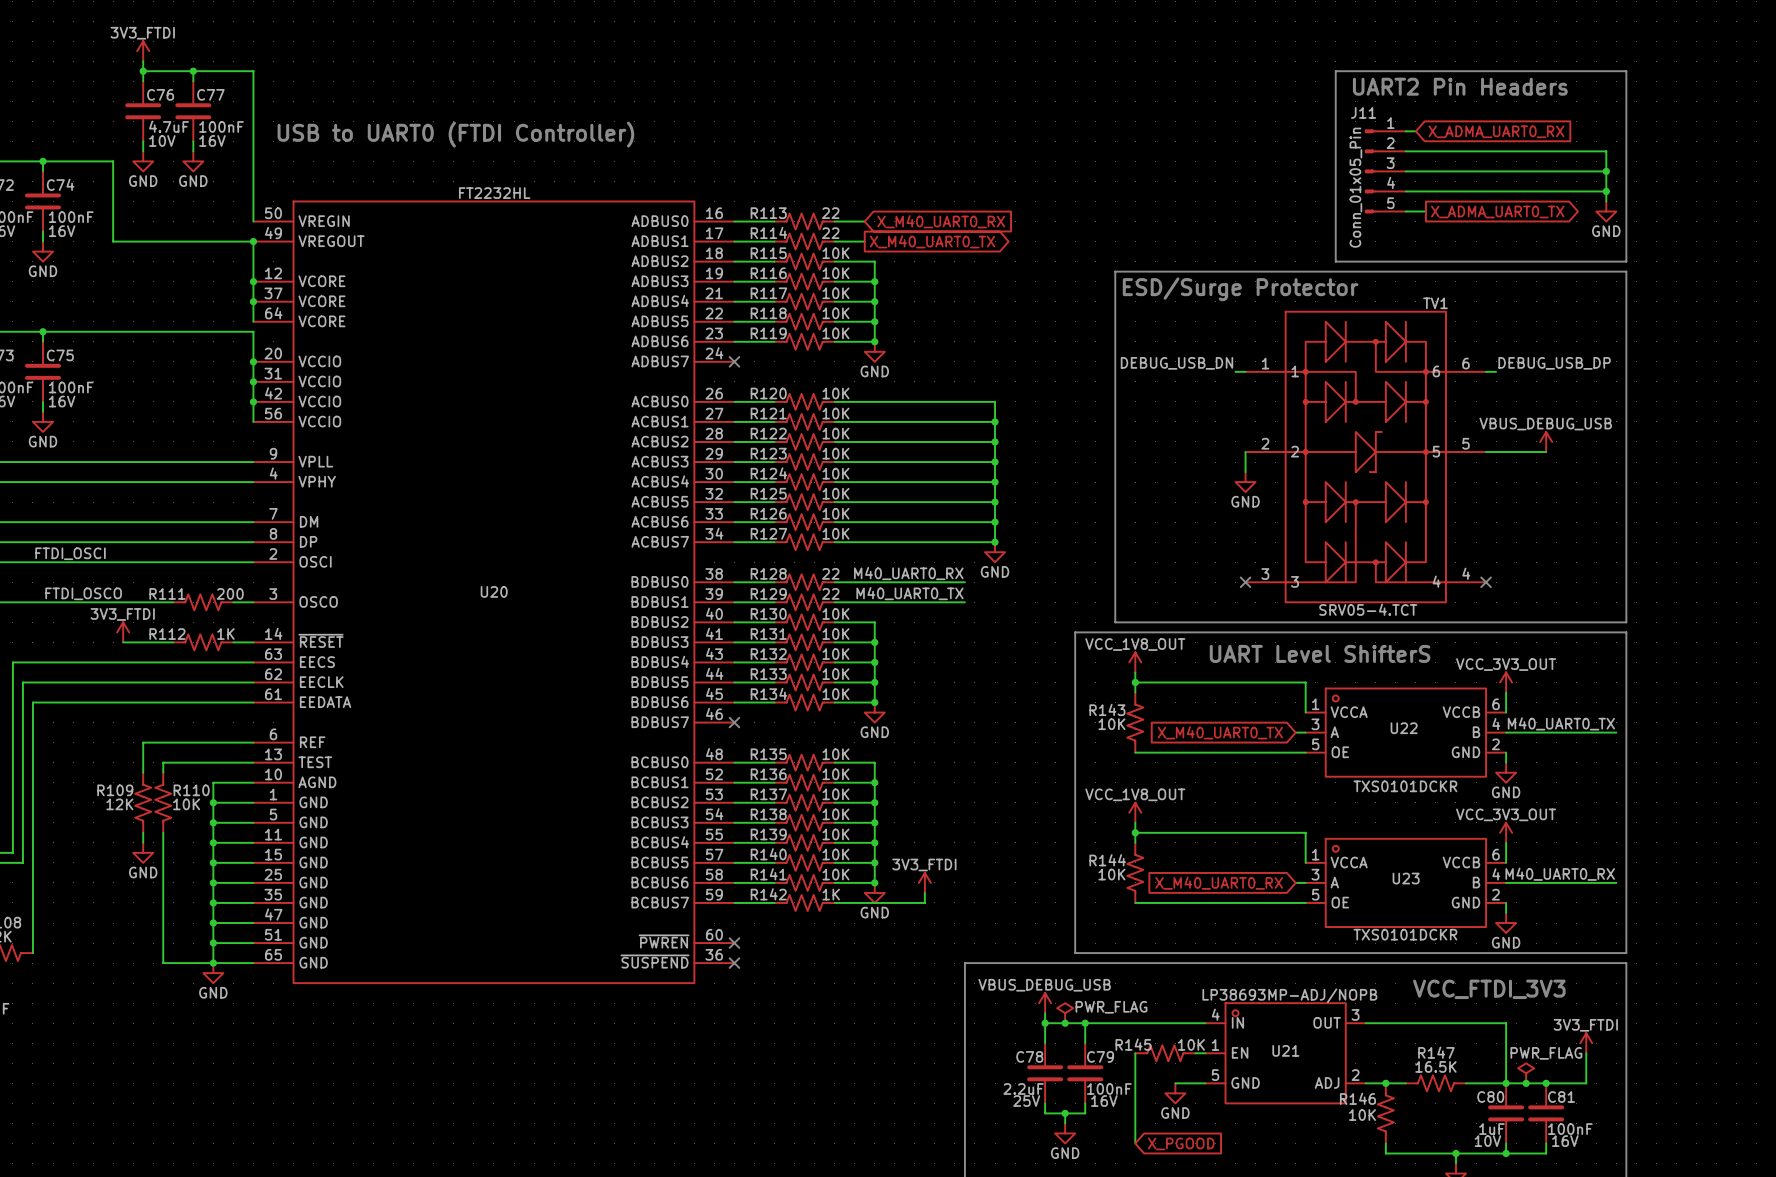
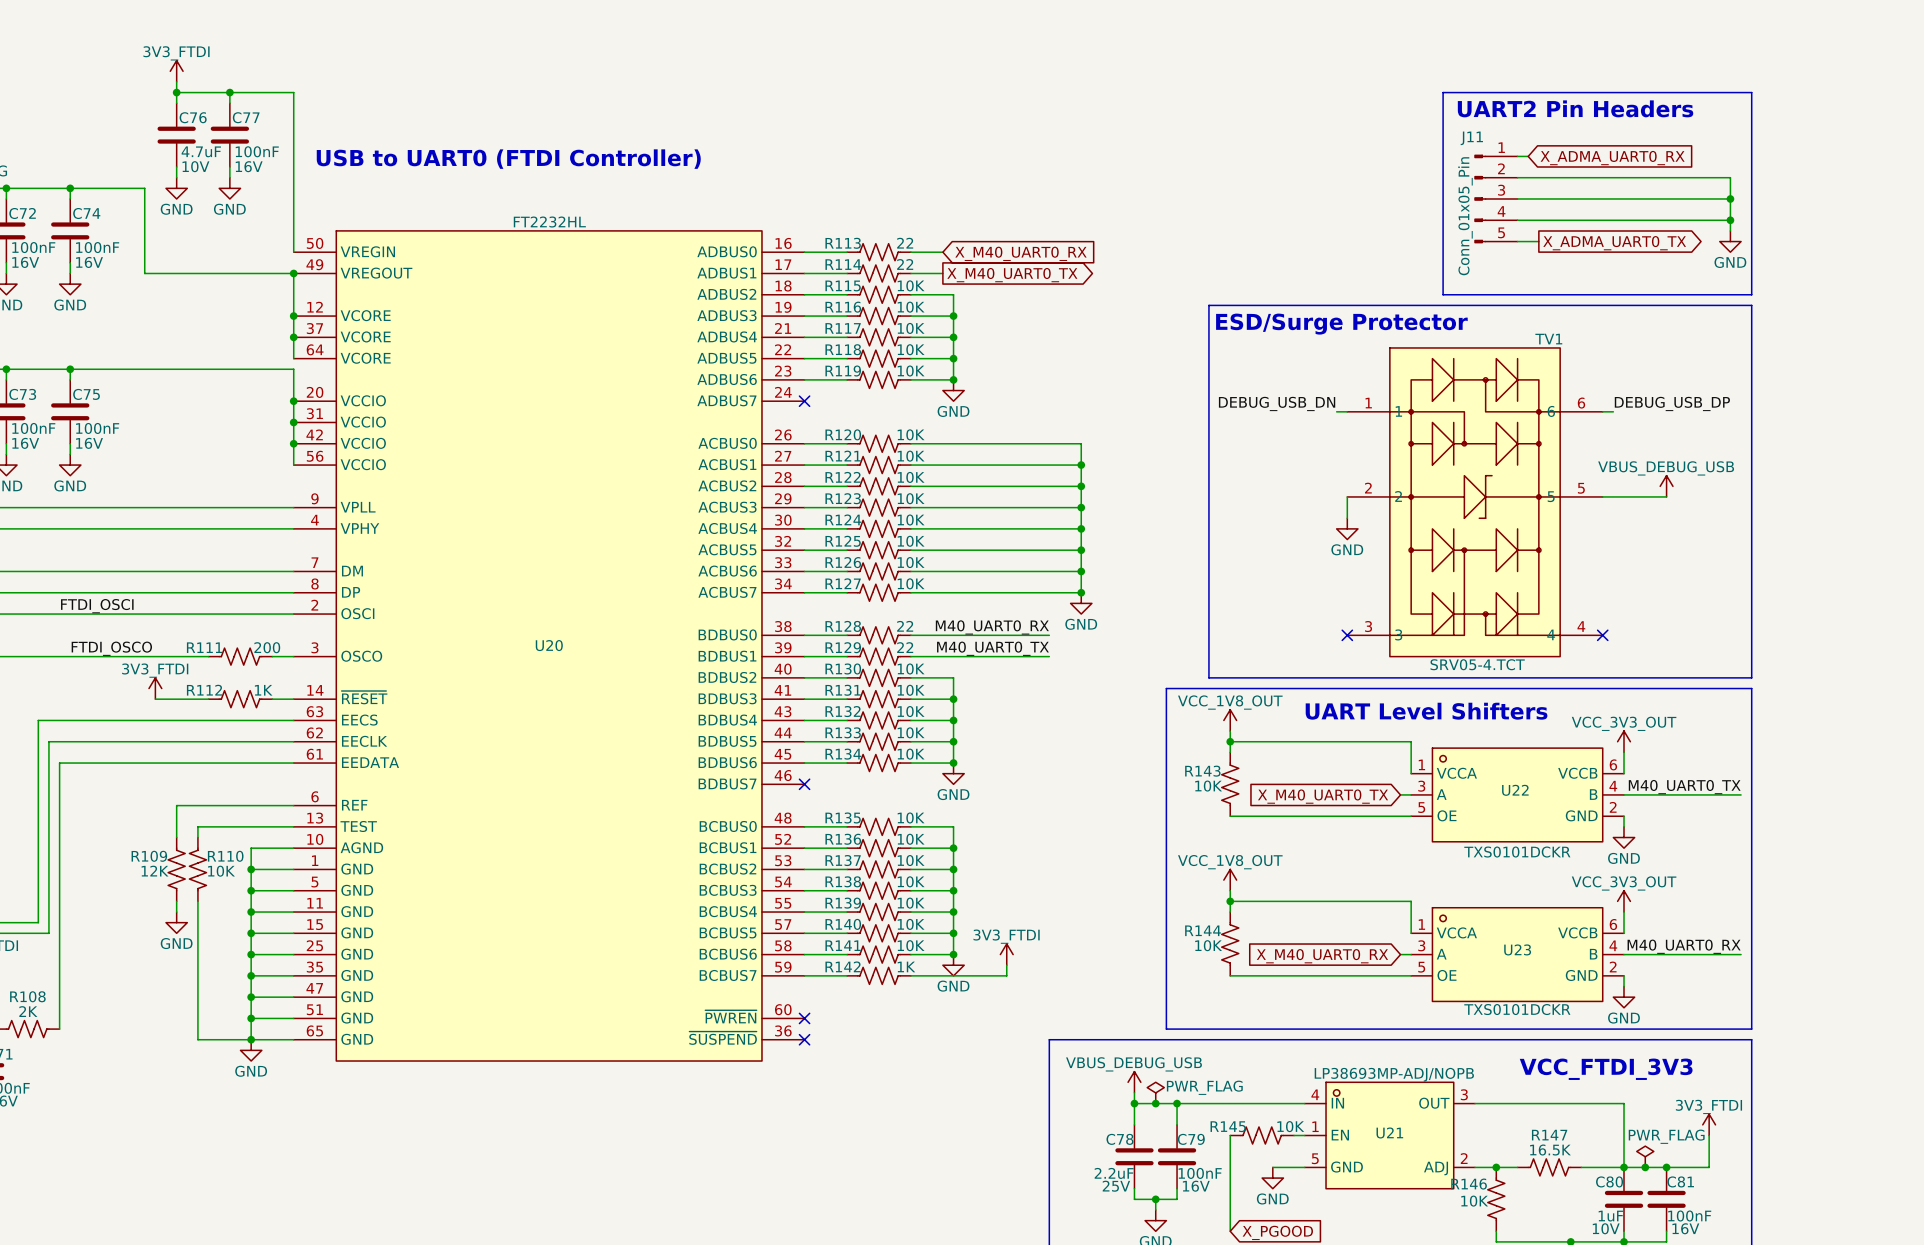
text: UART Level ShifterS (1320, 653) -> UART Level Shifters (1426, 711)

